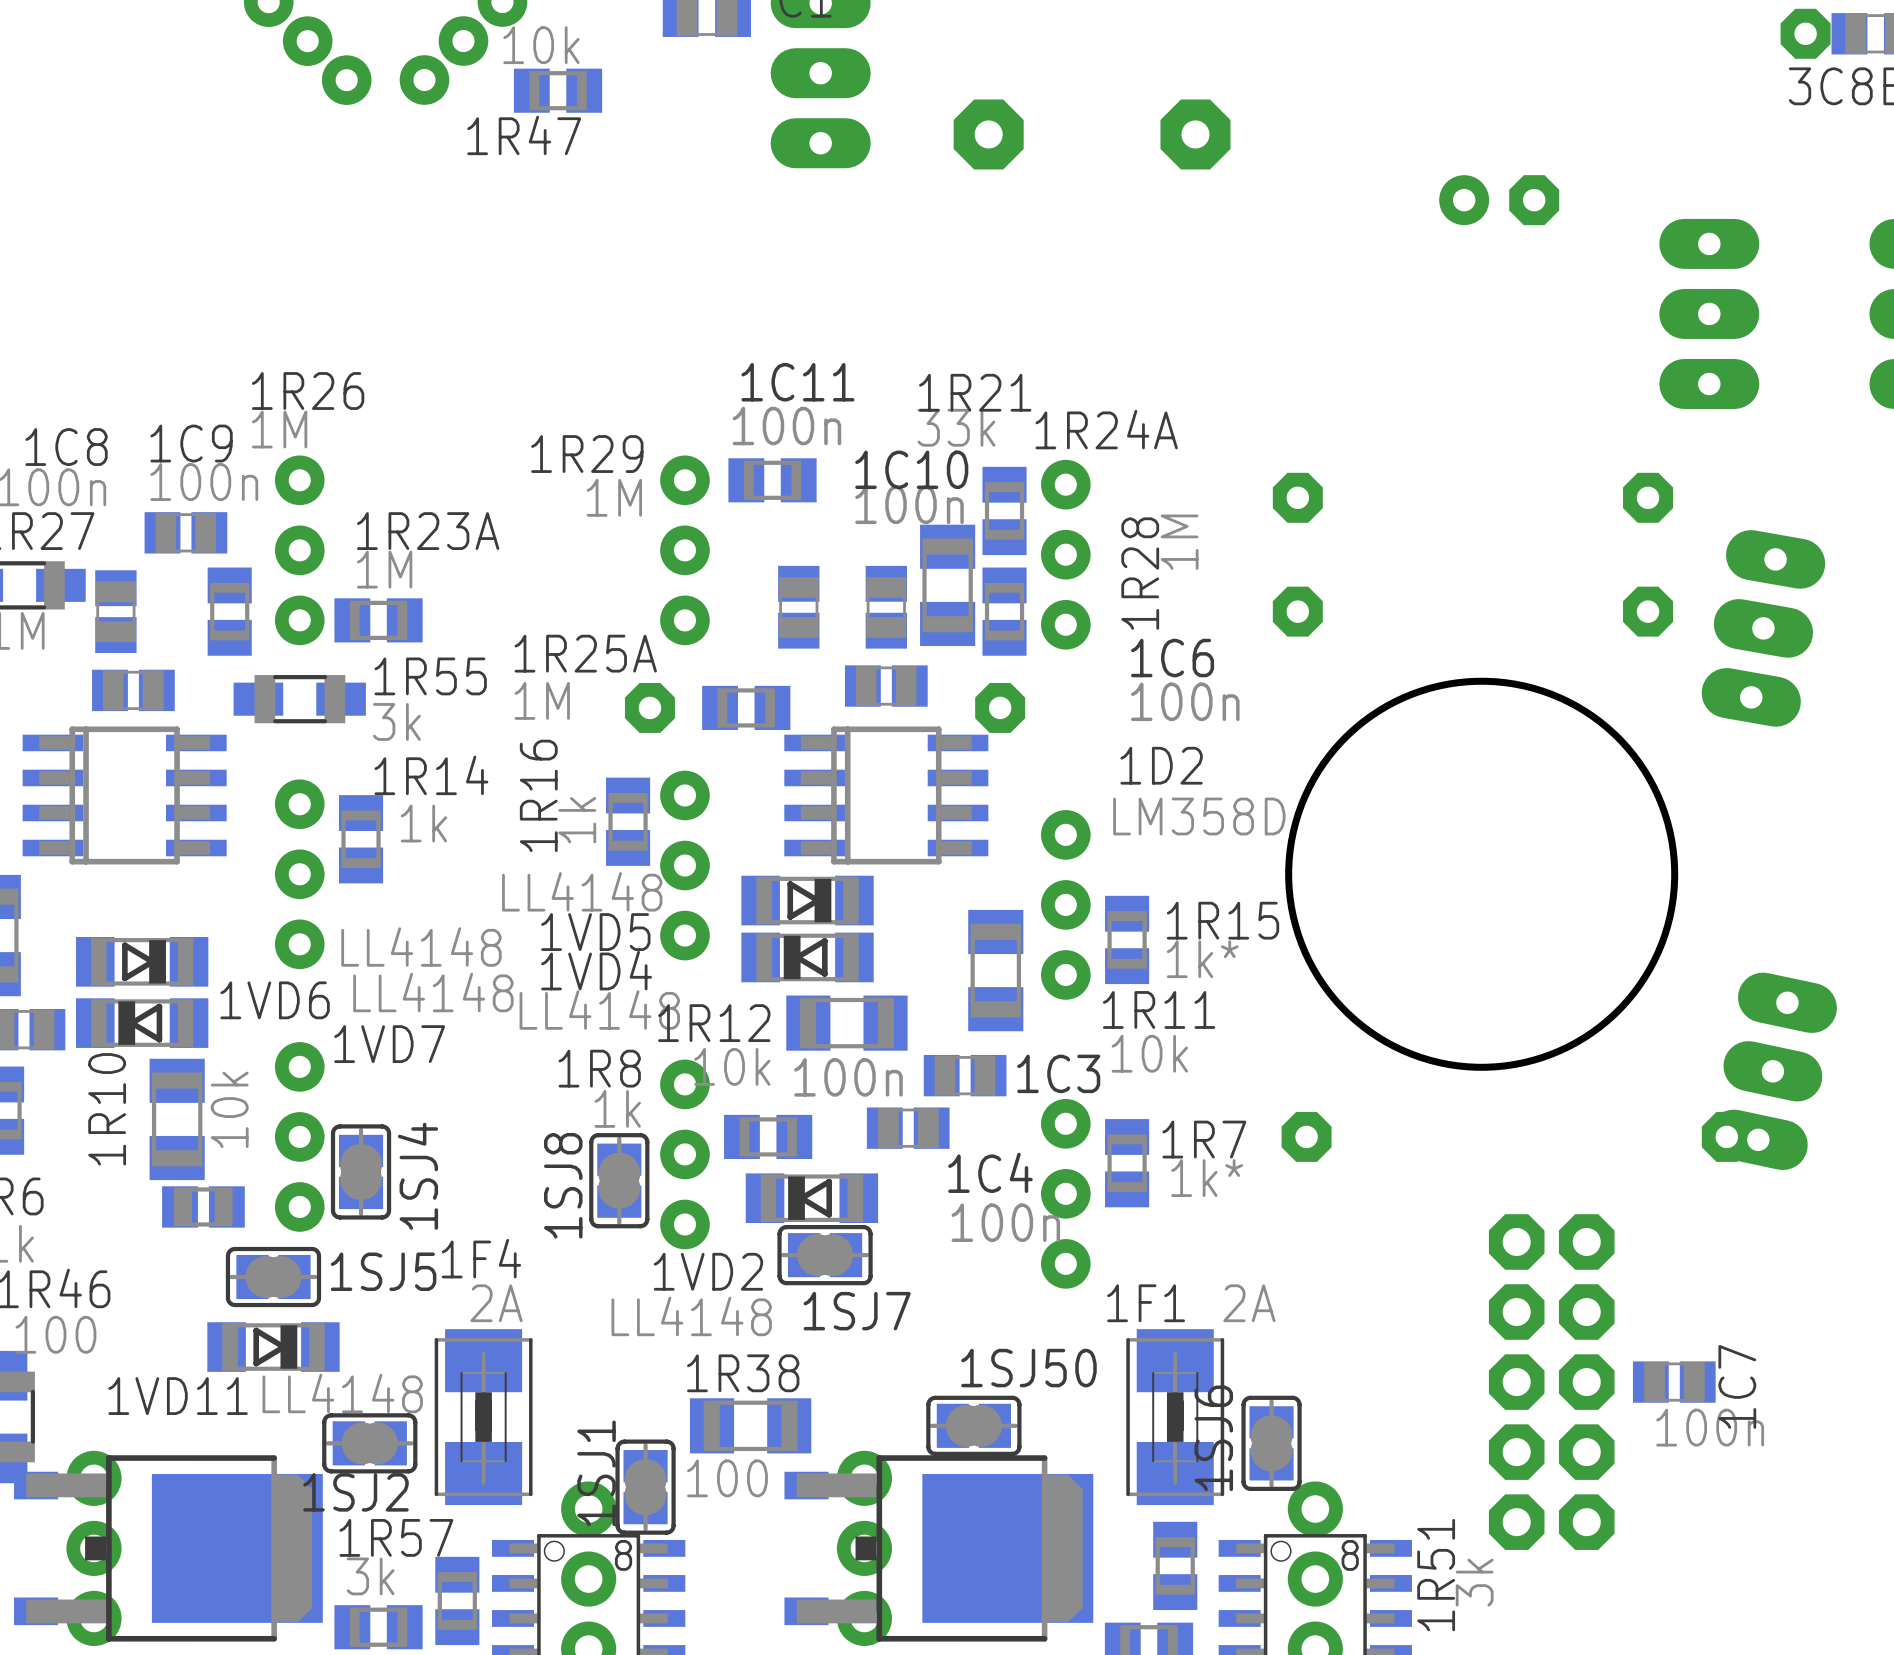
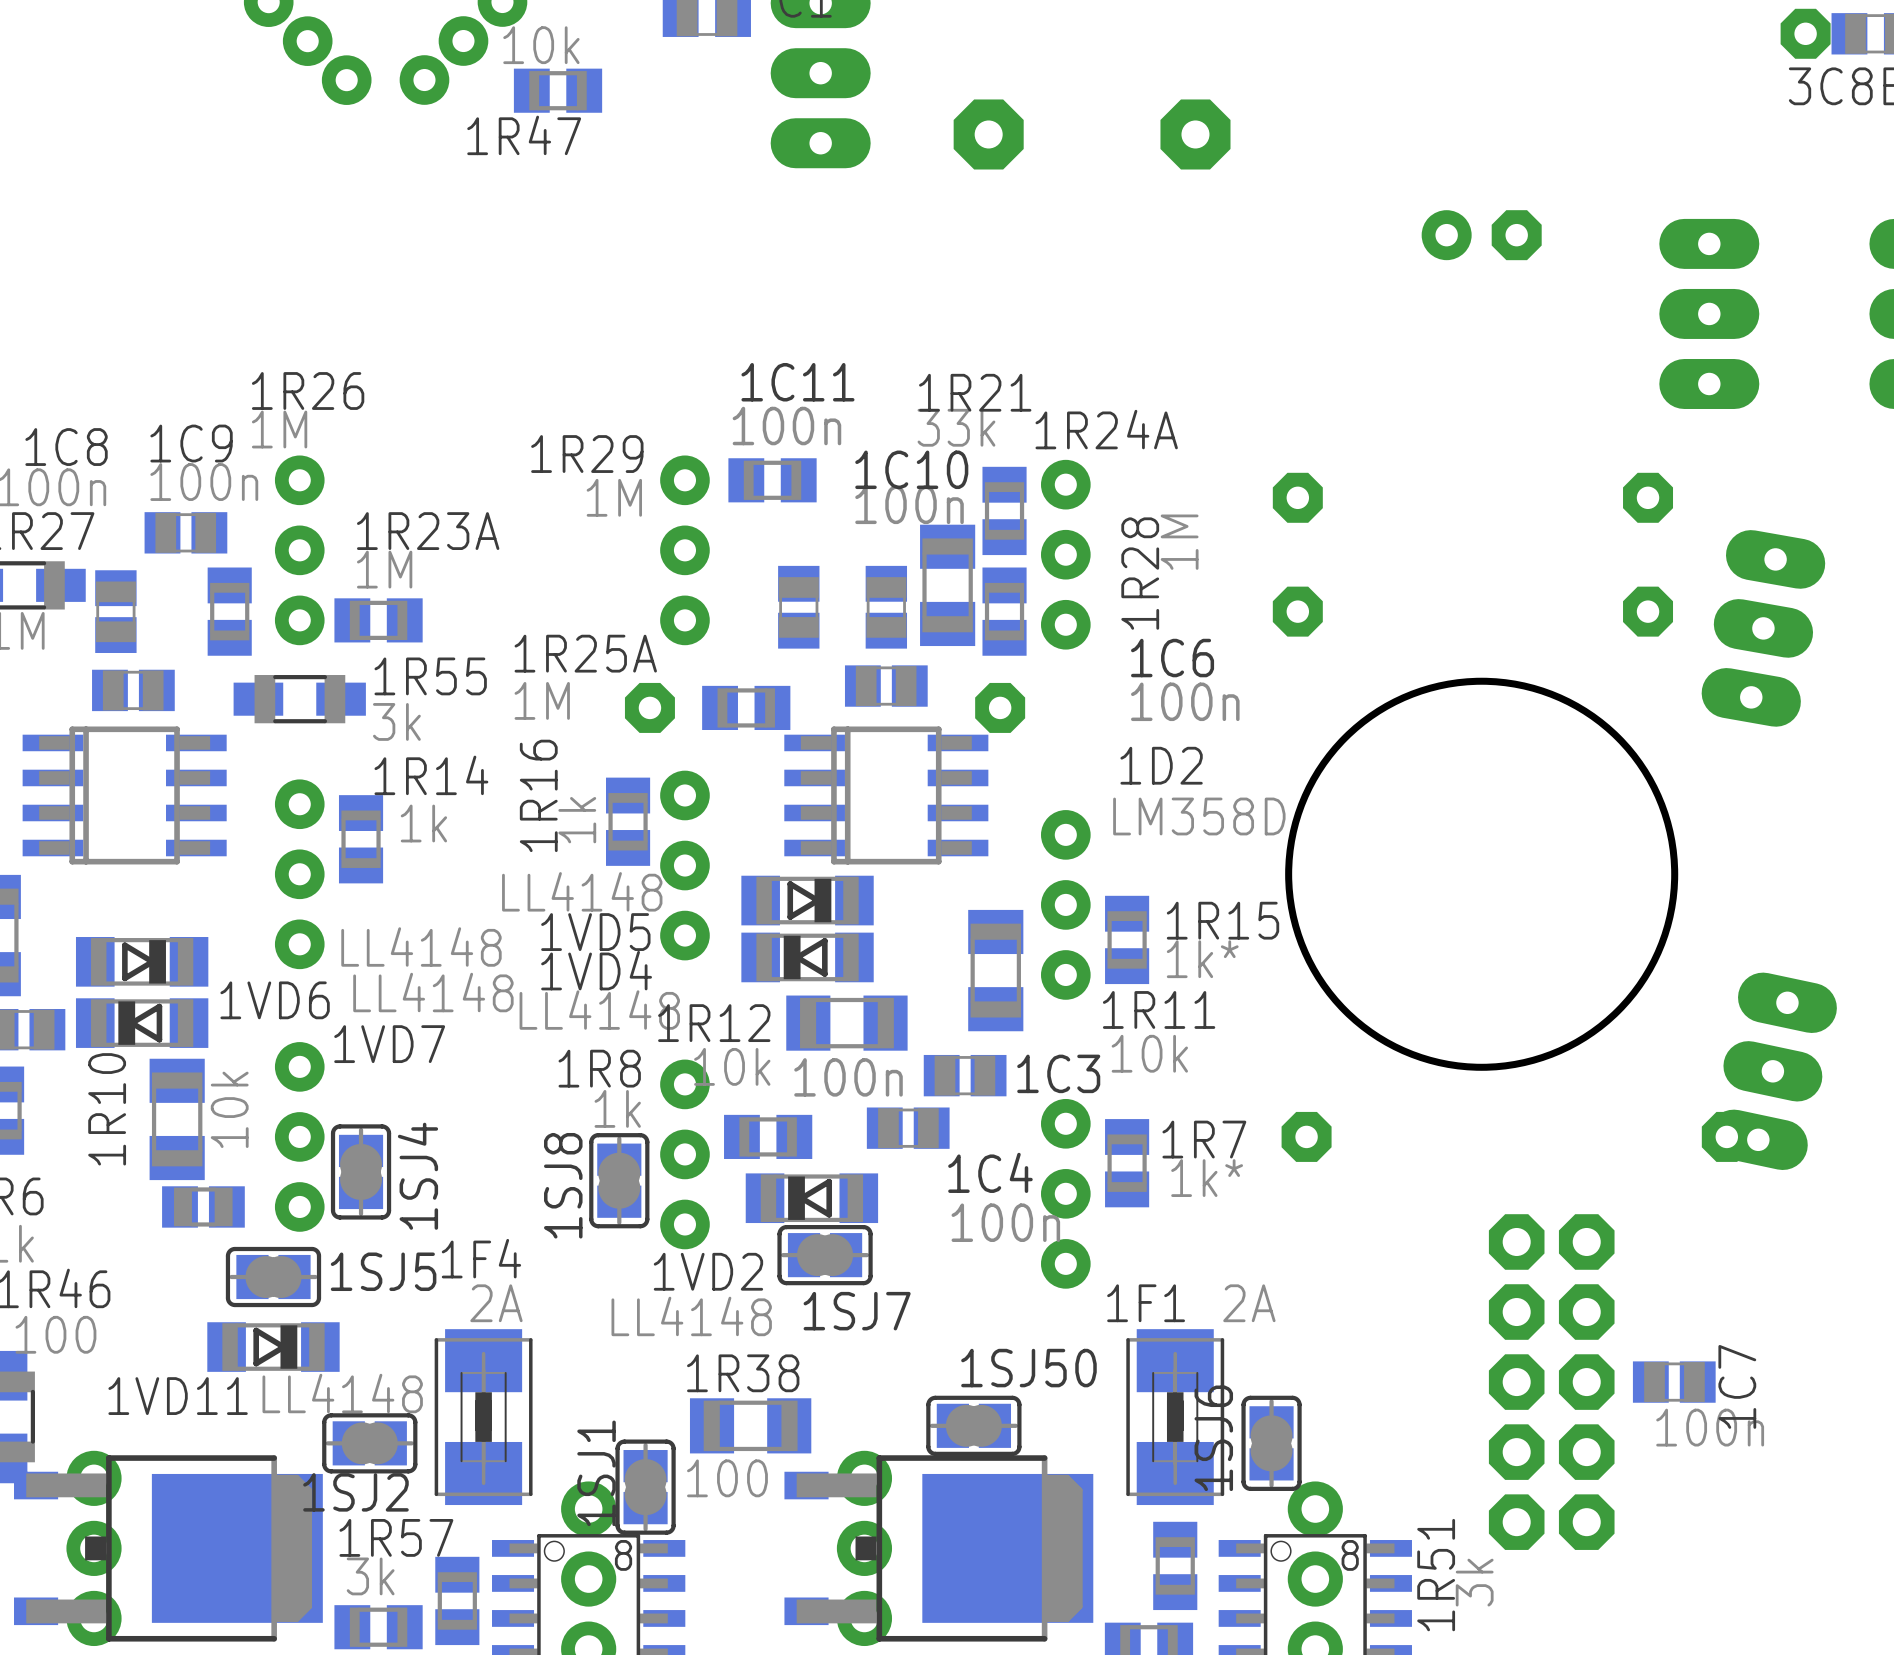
part position: (1499, 200) -> (1481, 235)

